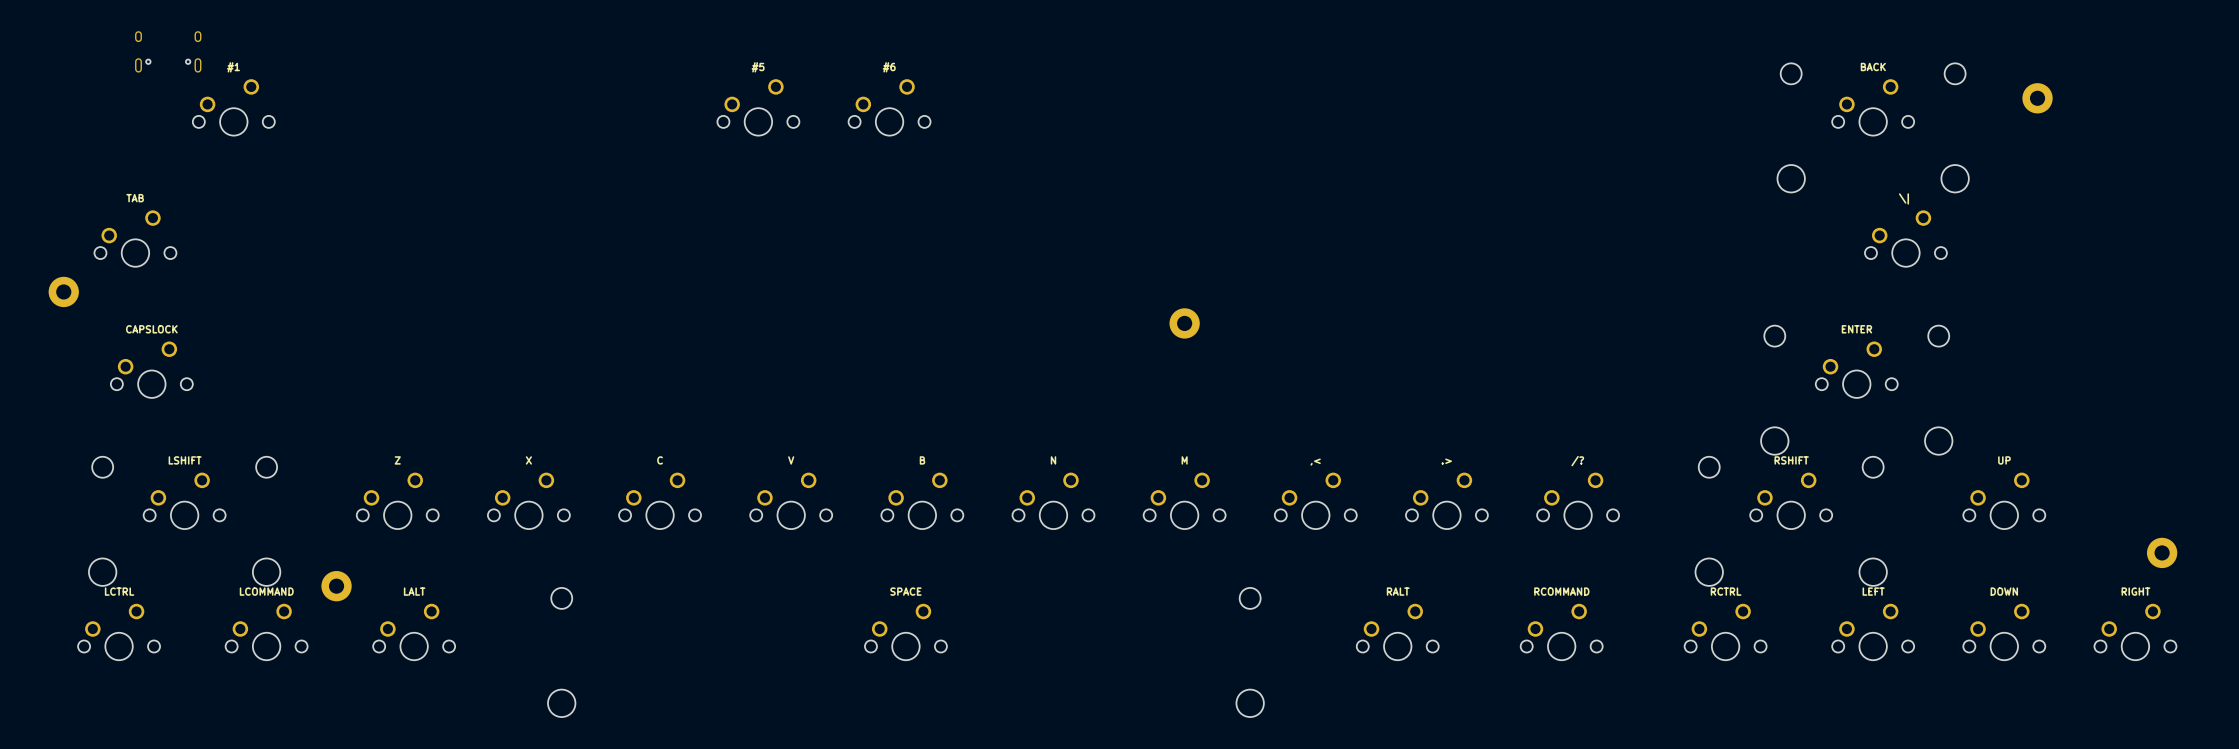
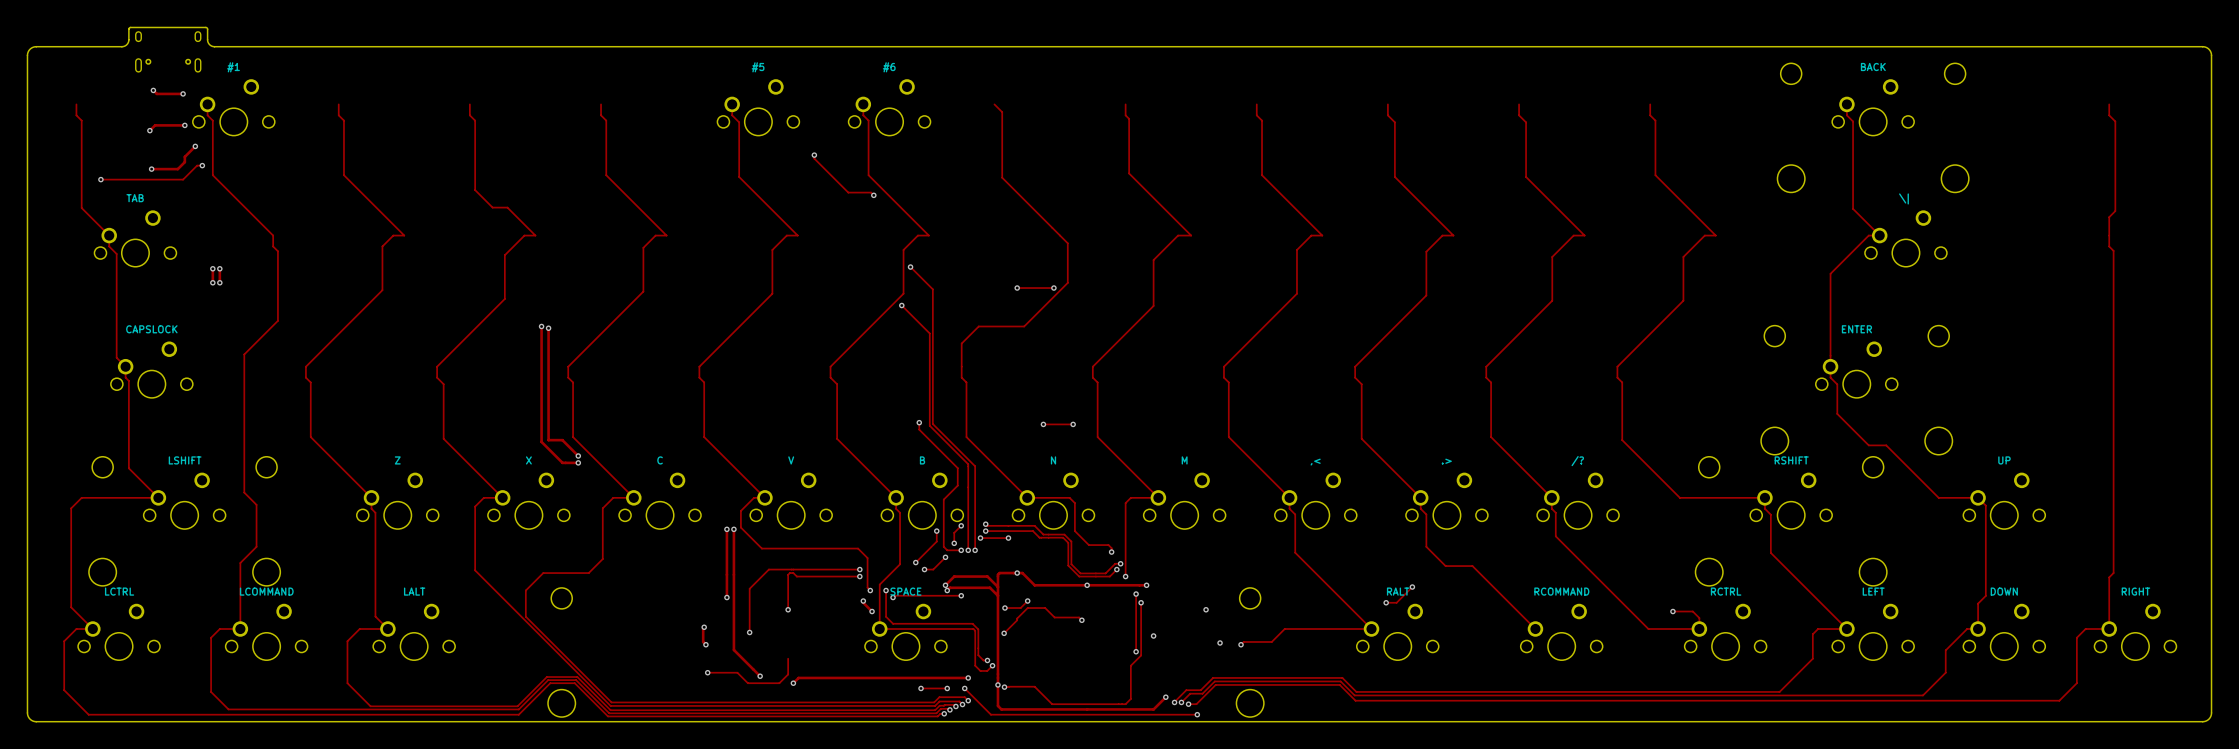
board edge: none -> (130, 27) (206, 27) (208, 42) (214, 46) (2205, 47) (2209, 50) (2211, 55) (2211, 715) (2208, 719) (2202, 721) (33, 721) (29, 718) (27, 712) (27, 54) (30, 49) (35, 46) (123, 46) (128, 42) (130, 27)
track: none -> (153, 90) (156, 93) (183, 93)
via: none -> (153, 90)
via: none -> (183, 93)
part: (2037, 98) -> none
track: none -> (76, 104) (76, 115) (81, 120) (81, 208) (109, 235) (109, 246) (116, 253) (116, 357) (125, 366) (125, 377) (128, 380) (128, 468) (158, 497) (81, 497) (71, 508) (71, 607) (92, 629) (76, 629) (64, 641) (64, 690) (88, 714) (518, 714) (550, 683) (574, 683) (608, 716) (937, 716) (944, 713)
track: none -> (207, 104) (207, 115) (212, 120) (212, 175) (273, 235) (273, 246) (277, 251) (277, 320) (244, 354) (244, 492) (256, 504) (256, 546) (240, 562) (240, 629) (219, 629) (211, 637) (211, 691) (228, 709) (518, 709) (548, 680) (576, 680) (609, 713) (936, 713) (940, 708) (949, 709)
track: none -> (338, 104) (338, 115) (343, 120) (343, 175) (404, 235) (393, 235) (382, 246) (382, 290) (305, 366) (305, 377) (310, 382) (310, 437) (371, 497) (371, 508) (375, 512) (375, 616) (387, 629) (359, 629) (347, 641) (347, 683) (370, 706) (517, 706) (546, 677) (577, 677) (610, 710) (935, 710) (939, 705) (955, 706)
track: none -> (469, 104) (469, 115) (475, 120) (475, 190) (492, 207) (507, 207) (535, 235) (524, 235) (504, 255) (504, 298) (437, 366) (437, 377) (443, 384) (443, 438) (502, 497) (483, 497) (475, 506) (475, 570) (610, 705) (935, 705) (939, 701) (959, 701) (962, 704)
track: none -> (601, 104) (601, 115) (606, 120) (606, 175) (666, 235) (655, 235) (643, 247) (643, 291) (568, 366) (568, 377) (573, 382) (573, 437) (633, 497) (613, 497) (602, 508) (602, 559) (588, 573) (543, 573) (525, 590) (525, 616) (611, 702) (934, 702) (939, 697) (964, 697) (968, 700)
track: none -> (732, 104) (732, 115) (739, 122) (739, 176) (797, 235) (786, 235) (772, 249) (772, 293) (699, 366) (699, 377) (704, 382) (704, 437) (764, 497) (754, 497) (740, 510) (740, 527) (761, 548) (858, 548) (867, 558) (867, 587) (870, 590)
track: none -> (863, 104) (863, 115) (868, 120) (868, 175) (928, 235) (917, 235) (903, 249) (903, 293) (830, 366) (830, 377) (837, 384) (837, 438) (896, 497) (896, 508) (900, 512) (900, 564) (879, 584) (879, 629) (973, 629) (975, 630) (975, 665) (980, 670) (987, 670) (992, 665)
track: none -> (994, 104) (1002, 112) (1002, 177) (1067, 243) (1067, 282) (1024, 326) (978, 326) (961, 343) (961, 377) (966, 382) (966, 437) (1027, 497) (1069, 497) (1074, 503) (1074, 531) (1088, 545) (1108, 545) (1111, 548) (1111, 552)
track: none -> (1125, 104) (1125, 115) (1129, 118) (1129, 173) (1191, 235) (1178, 235) (1153, 260) (1153, 305) (1092, 366) (1092, 377) (1097, 382) (1097, 437) (1158, 497) (1130, 497) (1125, 503) (1125, 576)
track: none -> (1256, 104) (1256, 115) (1262, 120) (1262, 175) (1322, 235) (1311, 235) (1296, 249) (1296, 293) (1223, 366) (1223, 377) (1228, 382) (1228, 437) (1289, 497) (1289, 508) (1295, 514) (1295, 552) (1371, 629) (1284, 629) (1271, 641) (1243, 641) (1241, 644)
track: none -> (1387, 104) (1387, 115) (1394, 122) (1394, 176) (1453, 235) (1442, 235) (1426, 251) (1426, 295) (1355, 366) (1355, 377) (1361, 384) (1361, 438) (1420, 497) (1420, 508) (1426, 514) (1426, 546) (1445, 566) (1472, 566) (1535, 629)
track: none -> (1519, 104) (1519, 115) (1526, 122) (1526, 176) (1584, 235) (1573, 235) (1552, 256) (1552, 300) (1486, 366) (1486, 377) (1491, 382) (1491, 437) (1551, 497) (1551, 508) (1555, 512) (1555, 536) (1648, 629) (1699, 629) (1699, 618) (1692, 611) (1672, 611)
track: none -> (1650, 104) (1650, 115) (1655, 120) (1655, 175) (1715, 235) (1704, 235) (1683, 256) (1683, 300) (1617, 366) (1617, 377) (1622, 382) (1622, 440) (1679, 497) (1764, 497) (1764, 508) (1770, 514) (1770, 552) (1846, 629) (1818, 629) (1812, 634) (1812, 658) (1779, 691) (1356, 691) (1342, 677) (1213, 677) (1200, 690) (1186, 690) (1174, 702)
track: none -> (1846, 104) (1846, 115) (1853, 121) (1853, 208) (1879, 235) (1868, 235) (1830, 273) (1830, 377) (1837, 384) (1837, 413) (1868, 445) (1886, 445) (1938, 497) (1978, 497) (1985, 505) (1985, 595) (1978, 603) (1978, 629) (1967, 629) (1945, 650) (1945, 672) (1922, 695) (1354, 695) (1340, 681) (1214, 681) (1202, 693) (1190, 693) (1181, 702)
track: none -> (2109, 104) (2109, 115) (2115, 121) (2115, 211) (2109, 217) (2109, 246) (2113, 250) (2113, 573) (2109, 577) (2109, 629) (2085, 629) (2076, 637) (2076, 683) (2059, 700) (1355, 700) (1339, 684) (1215, 684) (1196, 704) (1188, 704)
track: none -> (184, 125) (155, 125) (149, 130)
via: none -> (184, 125)
via: none -> (149, 130)
track: none -> (195, 146) (184, 156) (184, 162) (177, 169) (151, 169)
via: none -> (195, 146)
track: none -> (814, 155) (814, 158) (848, 192) (871, 192) (873, 195)
via: none -> (814, 155)
track: none -> (202, 165) (197, 165) (183, 179) (100, 179)
via: none -> (202, 165)
via: none -> (151, 169)
via: none -> (100, 179)
via: none -> (873, 195)
track: none -> (910, 267) (932, 289) (932, 424) (975, 466) (975, 550)
via: none -> (910, 267)
track: none -> (212, 268) (212, 282)
via: none -> (212, 268)
track: none -> (219, 268) (219, 282)
via: none -> (219, 268)
via: none -> (212, 282)
via: none -> (219, 282)
track: none -> (1017, 288) (1053, 288)
via: none -> (1017, 288)
via: none -> (1053, 288)
part: (63, 291) -> none
track: none -> (901, 305) (929, 333) (929, 425) (968, 464) (968, 550)
via: none -> (901, 305)
part: (1184, 323) -> none
track: none -> (541, 326) (541, 441) (562, 462) (578, 462)
via: none -> (541, 326)
track: none -> (548, 328) (548, 440) (562, 440) (578, 456)
via: none -> (548, 328)
track: none -> (919, 422) (919, 429) (957, 468) (957, 485) (943, 499) (943, 546) (947, 550) (961, 550)
via: none -> (919, 422)
track: none -> (1043, 424) (1073, 424)
via: none -> (1043, 424)
via: none -> (1073, 424)
via: none -> (578, 456)
via: none -> (578, 462)
track: none -> (985, 524) (987, 525) (1034, 525) (1043, 534) (1064, 534) (1071, 541) (1071, 564) (1080, 573) (1105, 573) (1115, 563) (1120, 563)
via: none -> (985, 524)
track: none -> (961, 525) (954, 532) (954, 543)
via: none -> (961, 525)
track: none -> (726, 529) (726, 597)
via: none -> (726, 529)
track: none -> (733, 529) (733, 649) (760, 676)
via: none -> (733, 529)
track: none -> (936, 531) (936, 541) (915, 562)
via: none -> (936, 531)
track: none -> (985, 531) (1032, 531) (1039, 537) (1063, 537) (1068, 542) (1068, 565) (1079, 576) (1109, 576) (1116, 569)
via: none -> (985, 531)
track: none -> (980, 538) (1008, 538)
via: none -> (980, 538)
via: none -> (1008, 538)
via: none -> (954, 543)
via: none -> (961, 550)
via: none -> (968, 550)
via: none -> (975, 550)
via: none -> (1111, 552)
part: (2162, 552) -> none
track: none -> (945, 557) (933, 569) (924, 569)
via: none -> (945, 557)
via: none -> (915, 562)
via: none -> (1120, 563)
track: none -> (859, 569) (768, 569) (749, 588) (749, 632)
via: none -> (859, 569)
via: none -> (924, 569)
via: none -> (1116, 569)
via: none -> (1017, 573)
track: none -> (859, 576) (796, 576) (793, 573) (789, 573) (788, 574) (788, 609)
via: none -> (859, 576)
via: none -> (1125, 576)
track: none -> (945, 585) (954, 576) (987, 576) (997, 587)
via: none -> (945, 585)
via: none -> (1087, 585)
track: none -> (1146, 585) (1034, 585) (1022, 573) (999, 573) (997, 574) (997, 705) (1001, 709) (1153, 709) (1165, 697)
via: none -> (1146, 585)
part: (336, 586) -> none
track: none -> (1412, 587) (1396, 602) (1386, 602)
via: none -> (1412, 587)
via: none -> (870, 590)
track: none -> (886, 590) (886, 616) (893, 623) (972, 623) (978, 629) (978, 655) (983, 660) (987, 660)
via: none -> (886, 590)
track: none -> (947, 590) (950, 587) (989, 587) (997, 595)
via: none -> (947, 590)
track: none -> (1136, 594) (1136, 651)
via: none -> (1136, 594)
track: none -> (961, 595) (894, 595) (893, 597)
via: none -> (961, 595)
via: none -> (726, 597)
via: none -> (893, 597)
track: none -> (863, 601) (872, 611)
via: none -> (863, 601)
track: none -> (1027, 601) (1020, 608) (1004, 608)
via: none -> (1027, 601)
track: none -> (1141, 602) (1141, 655) (1130, 665) (1130, 698) (1125, 704) (1052, 704) (1034, 686) (1004, 687)
via: none -> (1141, 602)
via: none -> (1386, 602)
via: none -> (1004, 608)
via: none -> (788, 609)
via: none -> (1206, 609)
via: none -> (872, 611)
via: none -> (1672, 611)
track: none -> (1081, 620) (1079, 617) (1054, 617) (1045, 608) (1027, 608) (1004, 633)
via: none -> (1081, 620)
track: none -> (704, 627) (703, 641) (705, 644)
via: none -> (704, 627)
via: none -> (749, 632)
via: none -> (1004, 633)
via: none -> (1153, 636)
via: none -> (1220, 642)
via: none -> (705, 644)
via: none -> (1241, 644)
via: none -> (1136, 651)
track: none -> (788, 658) (788, 674) (779, 683) (747, 683) (737, 672) (707, 672)
via: none -> (987, 660)
via: none -> (992, 665)
via: none -> (707, 672)
via: none -> (760, 676)
track: none -> (968, 677) (798, 677) (793, 683)
via: none -> (968, 677)
via: none -> (793, 683)
via: none -> (997, 684)
via: none -> (1004, 687)
track: none -> (921, 688) (947, 688)
via: none -> (921, 688)
via: none -> (947, 688)
track: none -> (964, 688) (990, 714) (1197, 714)
via: none -> (964, 688)
via: none -> (1165, 697)
via: none -> (968, 700)
via: none -> (1174, 702)
via: none -> (1181, 702)
via: none -> (962, 704)
via: none -> (1188, 704)
via: none -> (955, 706)
via: none -> (949, 709)
via: none -> (944, 713)
via: none -> (1197, 714)

